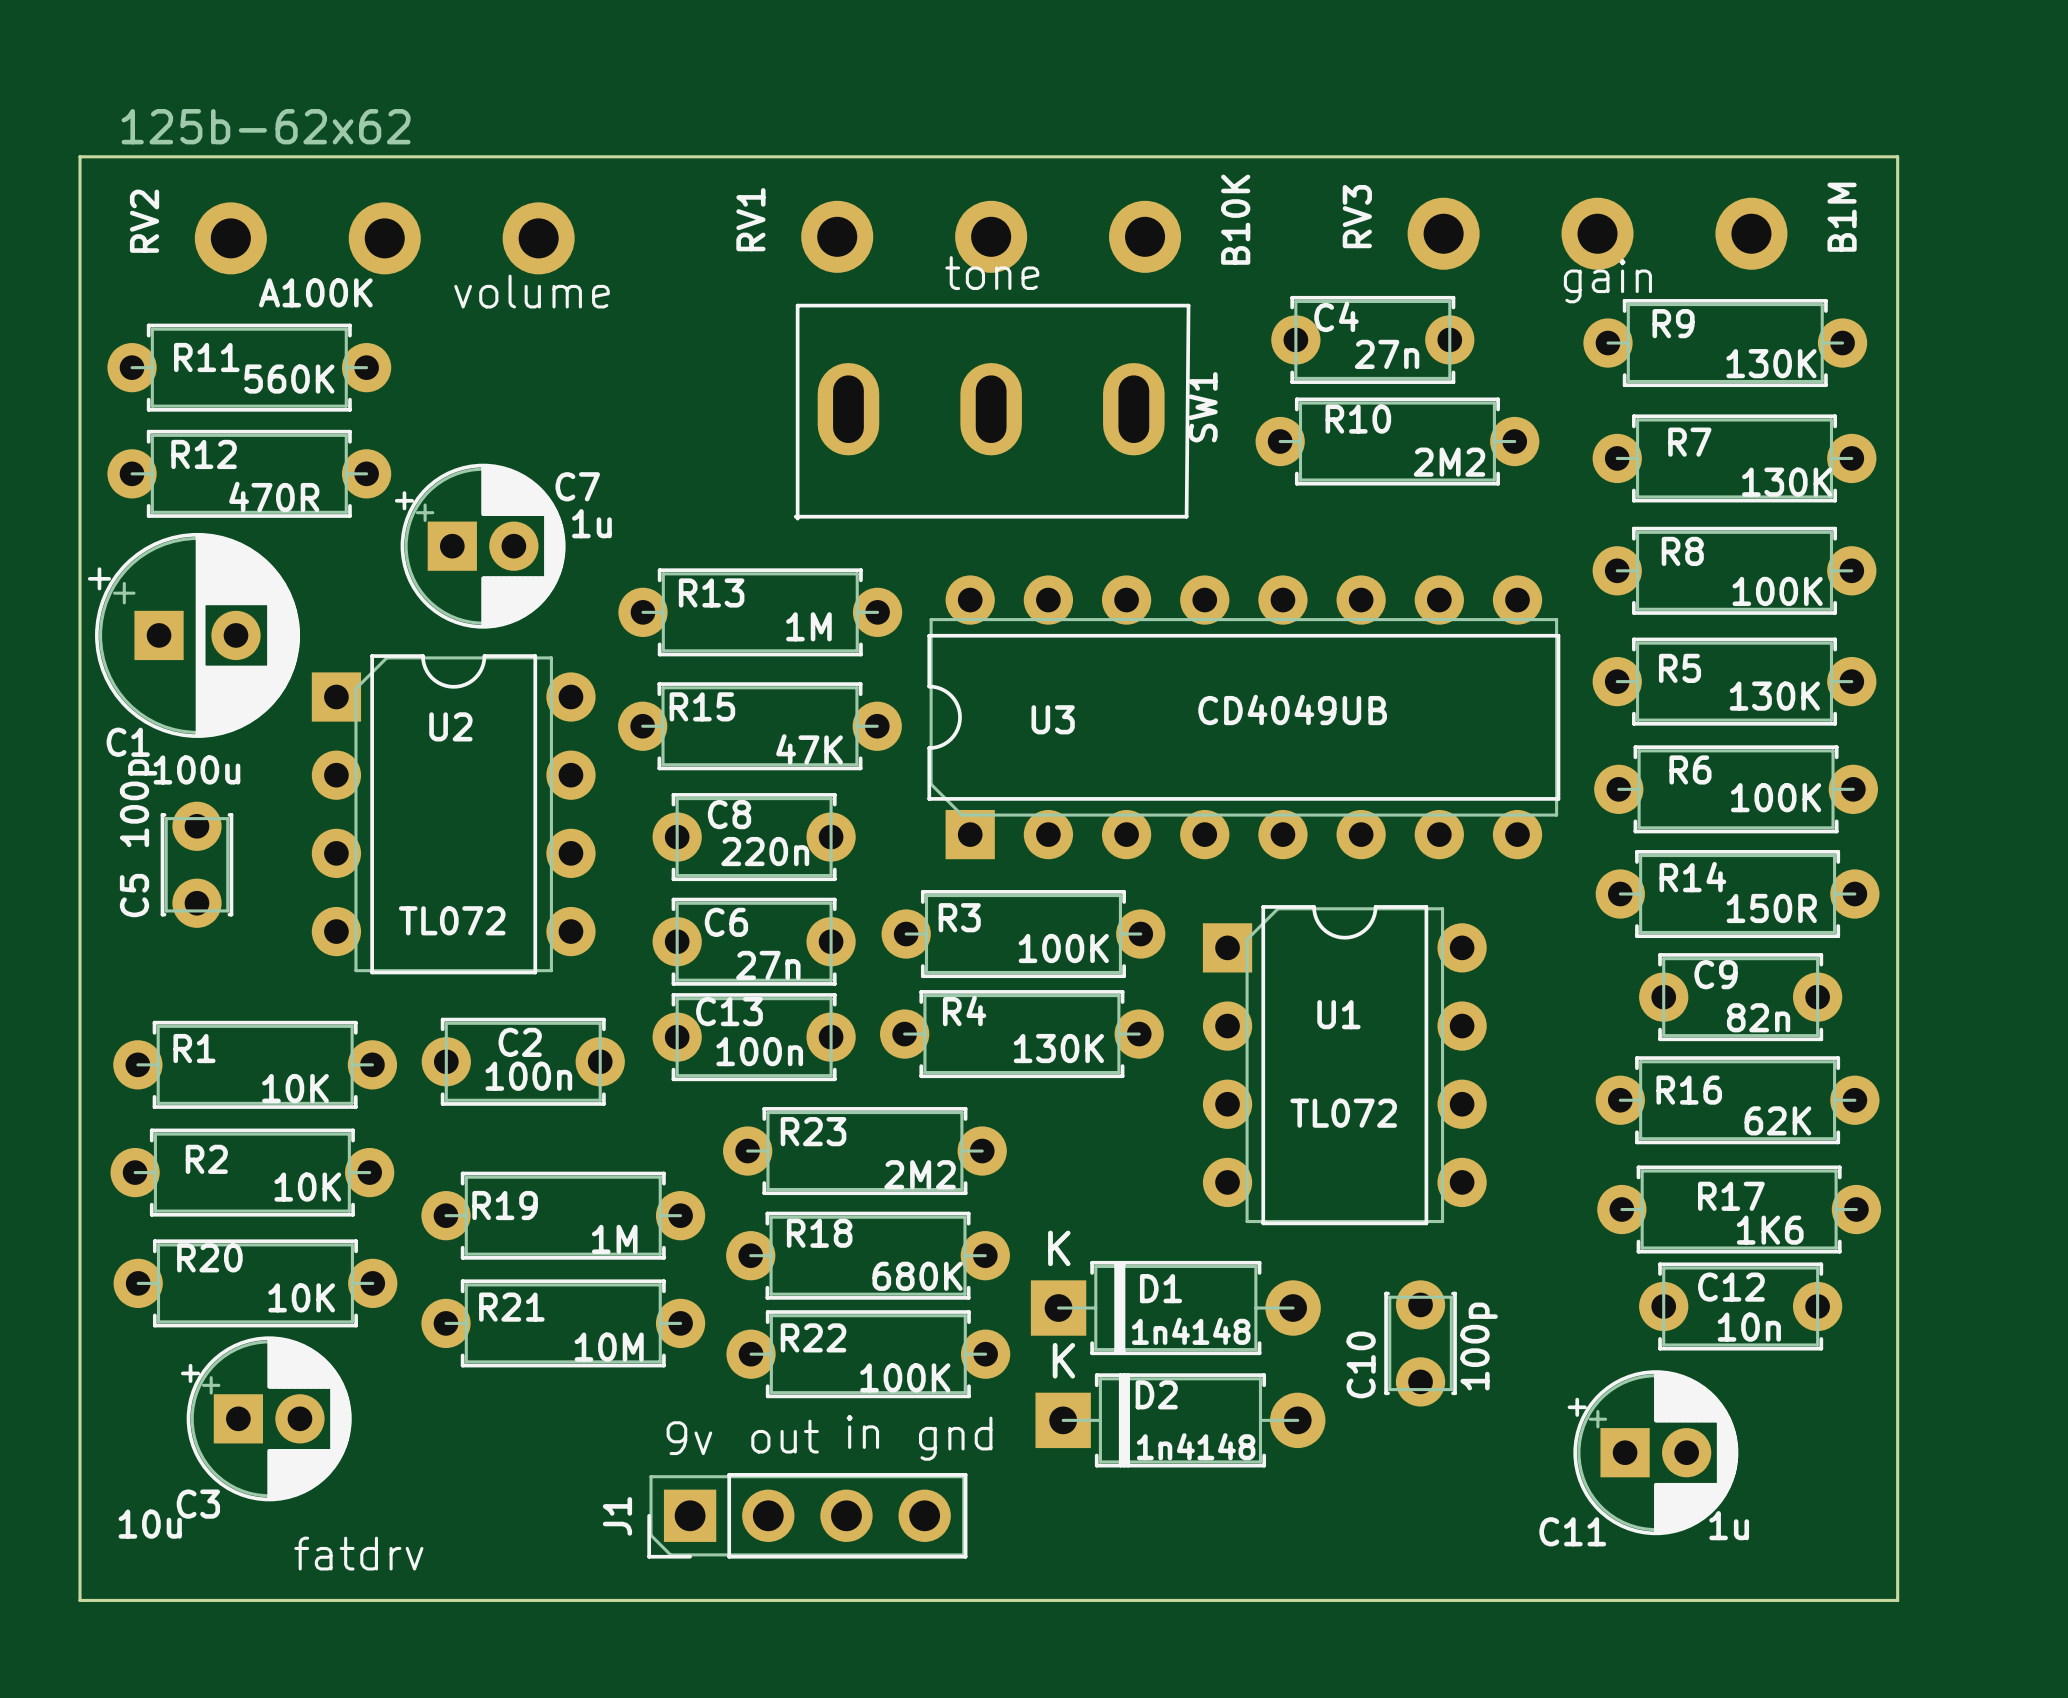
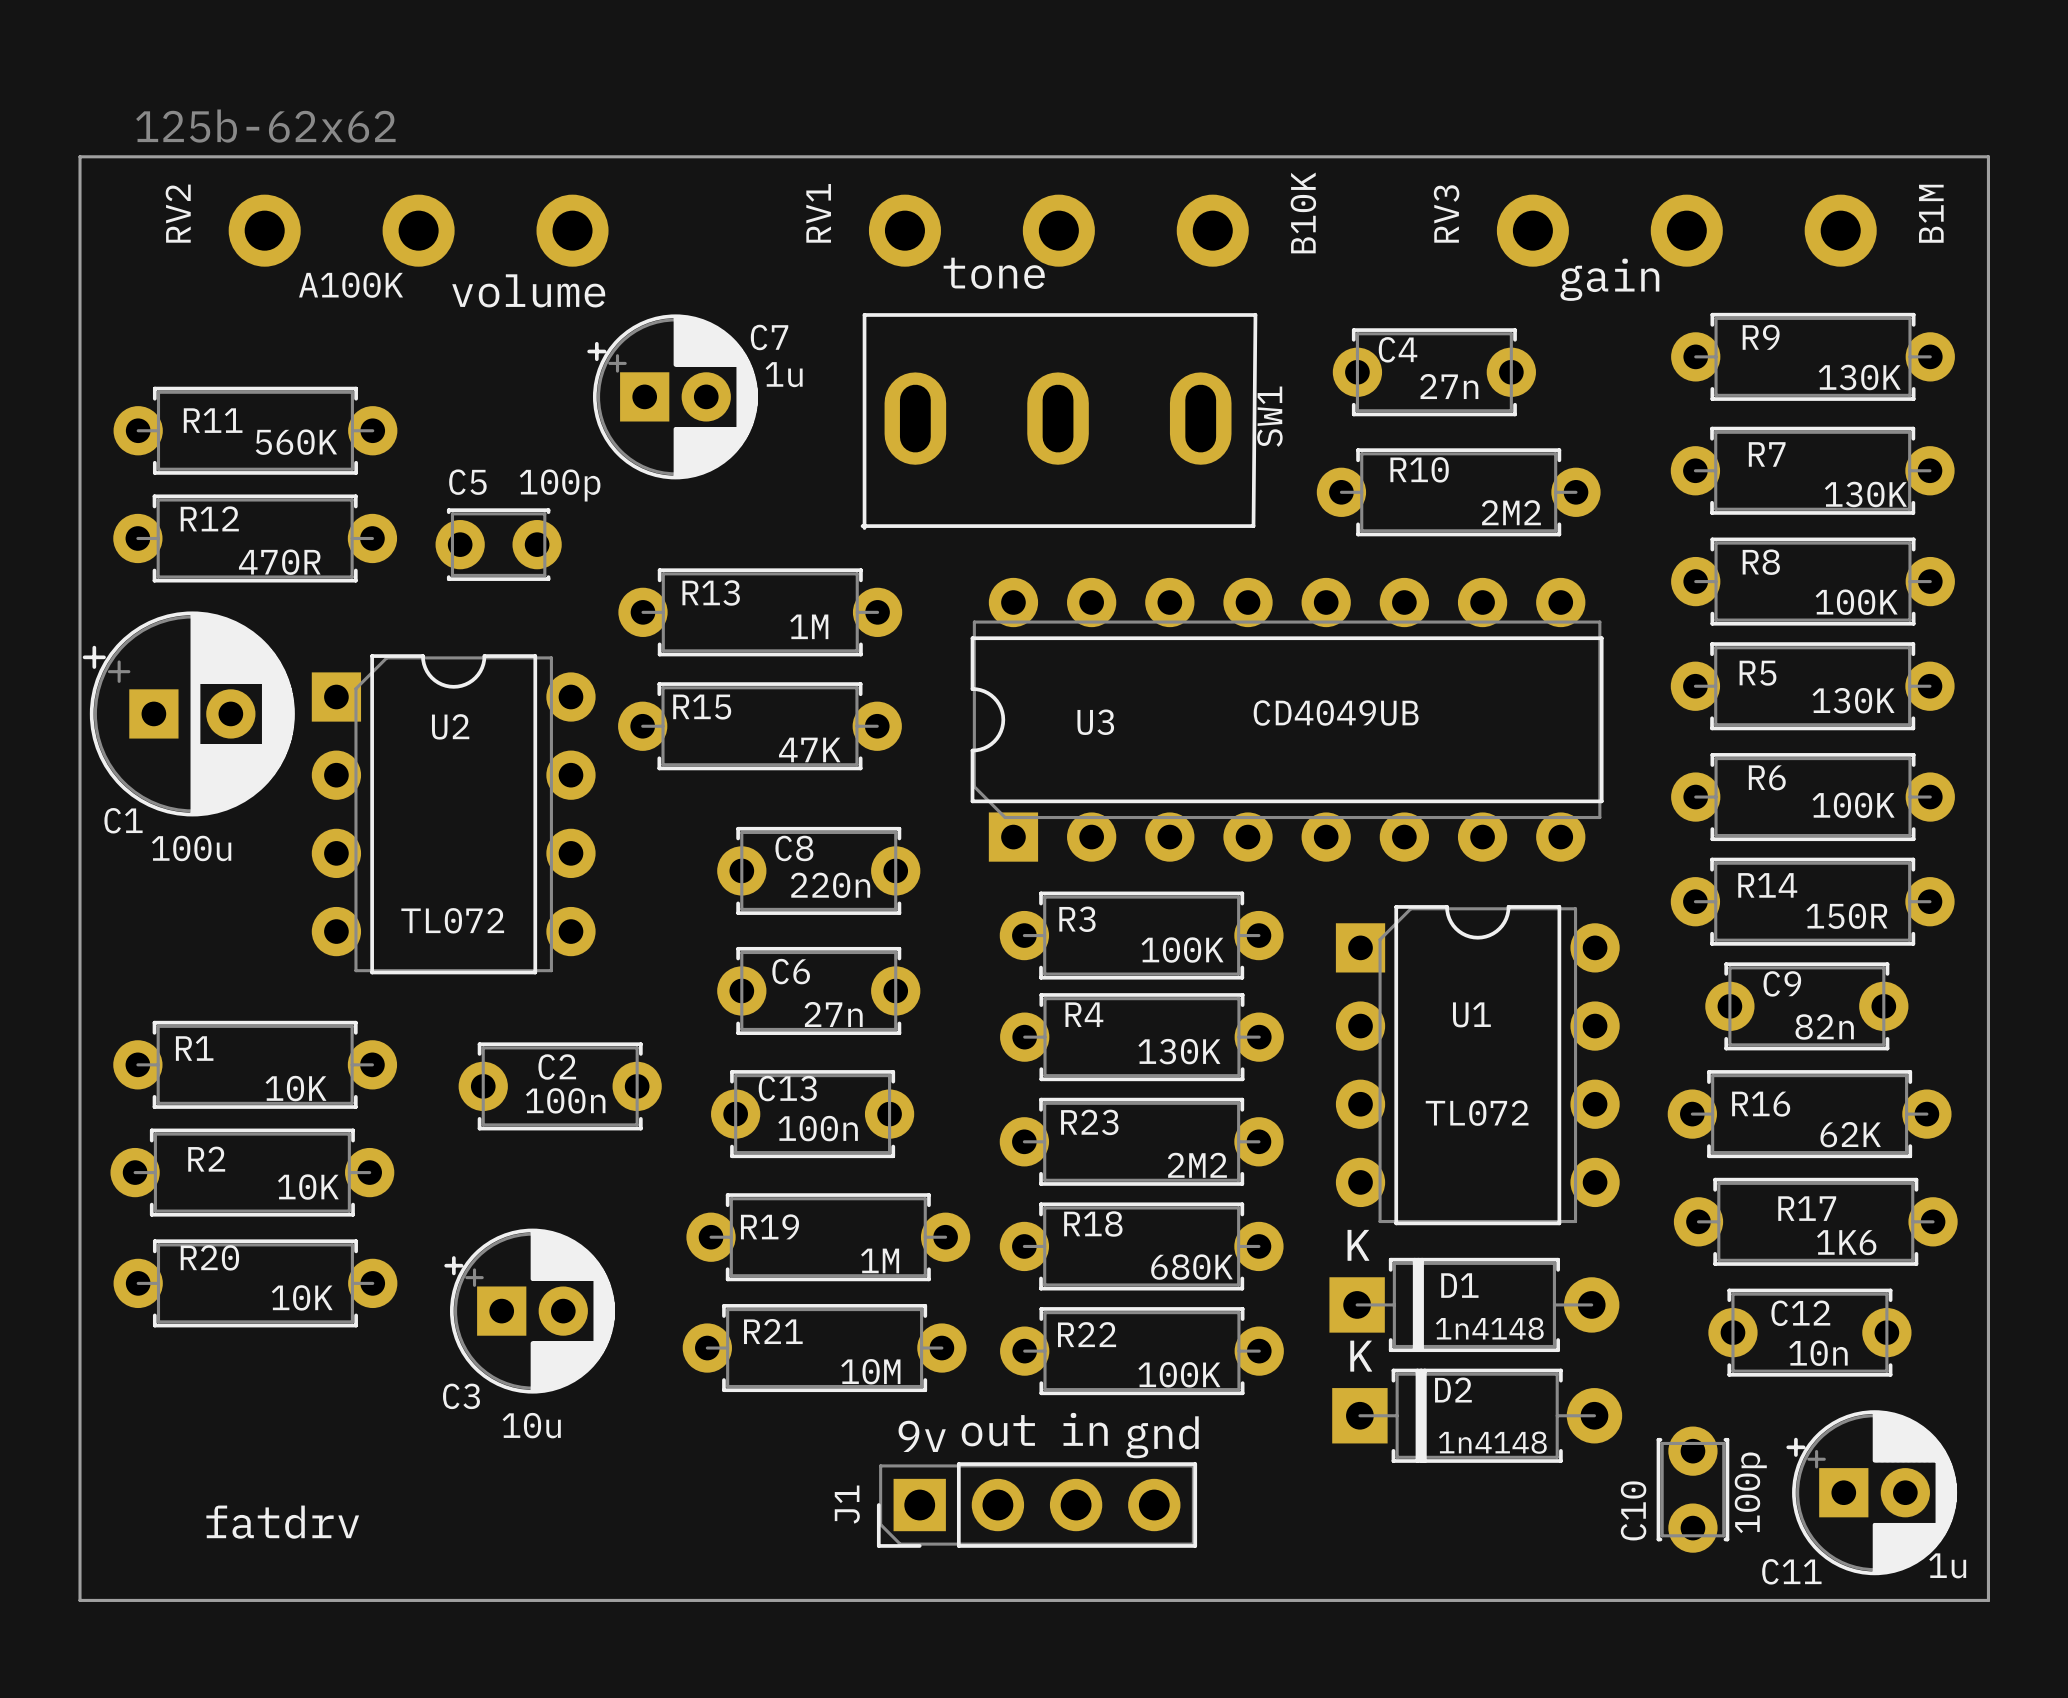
board edge: (1897, 156) (1897, 1600) -> (1897, 156) (1988, 156) (1988, 1600) (1897, 1600)
RV3 position: (1597, 233) -> (1686, 230)
RV1 position: (991, 236) -> (1058, 230)
RV2 position: (384, 238) -> (418, 230)
C4 position: (1372, 339) -> (1434, 372)
R9 position: (1725, 343) -> (1813, 356)
R11 position: (249, 367) -> (255, 430)
SW1 position: (992, 412) -> (1059, 421)
R10 position: (1397, 441) -> (1458, 492)
R7 position: (1734, 458) -> (1812, 470)
R12 position: (249, 473) -> (255, 538)
C7 position: (480, 546) -> (672, 396)
R8 position: (1734, 570) -> (1813, 581)
C1 position: (193, 635) -> (188, 713)
R5 position: (1734, 681) -> (1812, 686)
U3 position: (1243, 717) -> (1287, 719)
R6 position: (1736, 789) -> (1813, 797)
C8 position: (754, 837) -> (818, 870)
C5 rotation: 0° (196, 864) -> 90° clockwise (498, 544)
C5 position: (196, 864) -> (498, 544)
R14 position: (1737, 894) -> (1812, 901)
R3 position: (1023, 934) -> (1141, 935)
C6 position: (754, 941) -> (818, 990)
C9 position: (1740, 997) -> (1806, 1006)
R4 position: (1021, 1034) -> (1141, 1037)
C13 position: (754, 1037) -> (812, 1114)
C2 position: (523, 1061) -> (560, 1086)
U1 position: (1344, 1065) -> (1477, 1065)
R16 position: (1737, 1100) -> (1809, 1114)
R23 position: (864, 1151) -> (1141, 1141)
R17 position: (1739, 1209) -> (1815, 1221)
R19 position: (563, 1215) -> (828, 1237)
R18 position: (868, 1255) -> (1141, 1246)
C12 position: (1740, 1306) -> (1809, 1332)
D1 position: (1175, 1308) -> (1474, 1304)
R21 position: (563, 1323) -> (824, 1348)
C10 position: (1420, 1343) -> (1692, 1489)
R22 position: (868, 1354) -> (1141, 1351)
C3 position: (266, 1418) -> (529, 1311)
D2 position: (1180, 1420) -> (1477, 1415)
text position: in (862, 1431) -> in (1085, 1429)
text position: out (785, 1436) -> out (998, 1430)
text position: 9v (689, 1438) -> 9v (922, 1436)
text position: gnd (955, 1438) -> gnd (1162, 1437)
C11 position: (1653, 1452) -> (1871, 1492)
J1 position: (807, 1515) -> (1037, 1505)
C3 value position: 10u (150, 1524) -> 10u (531, 1425)
text position: fatdrv (358, 1553) -> fatdrv (282, 1522)

